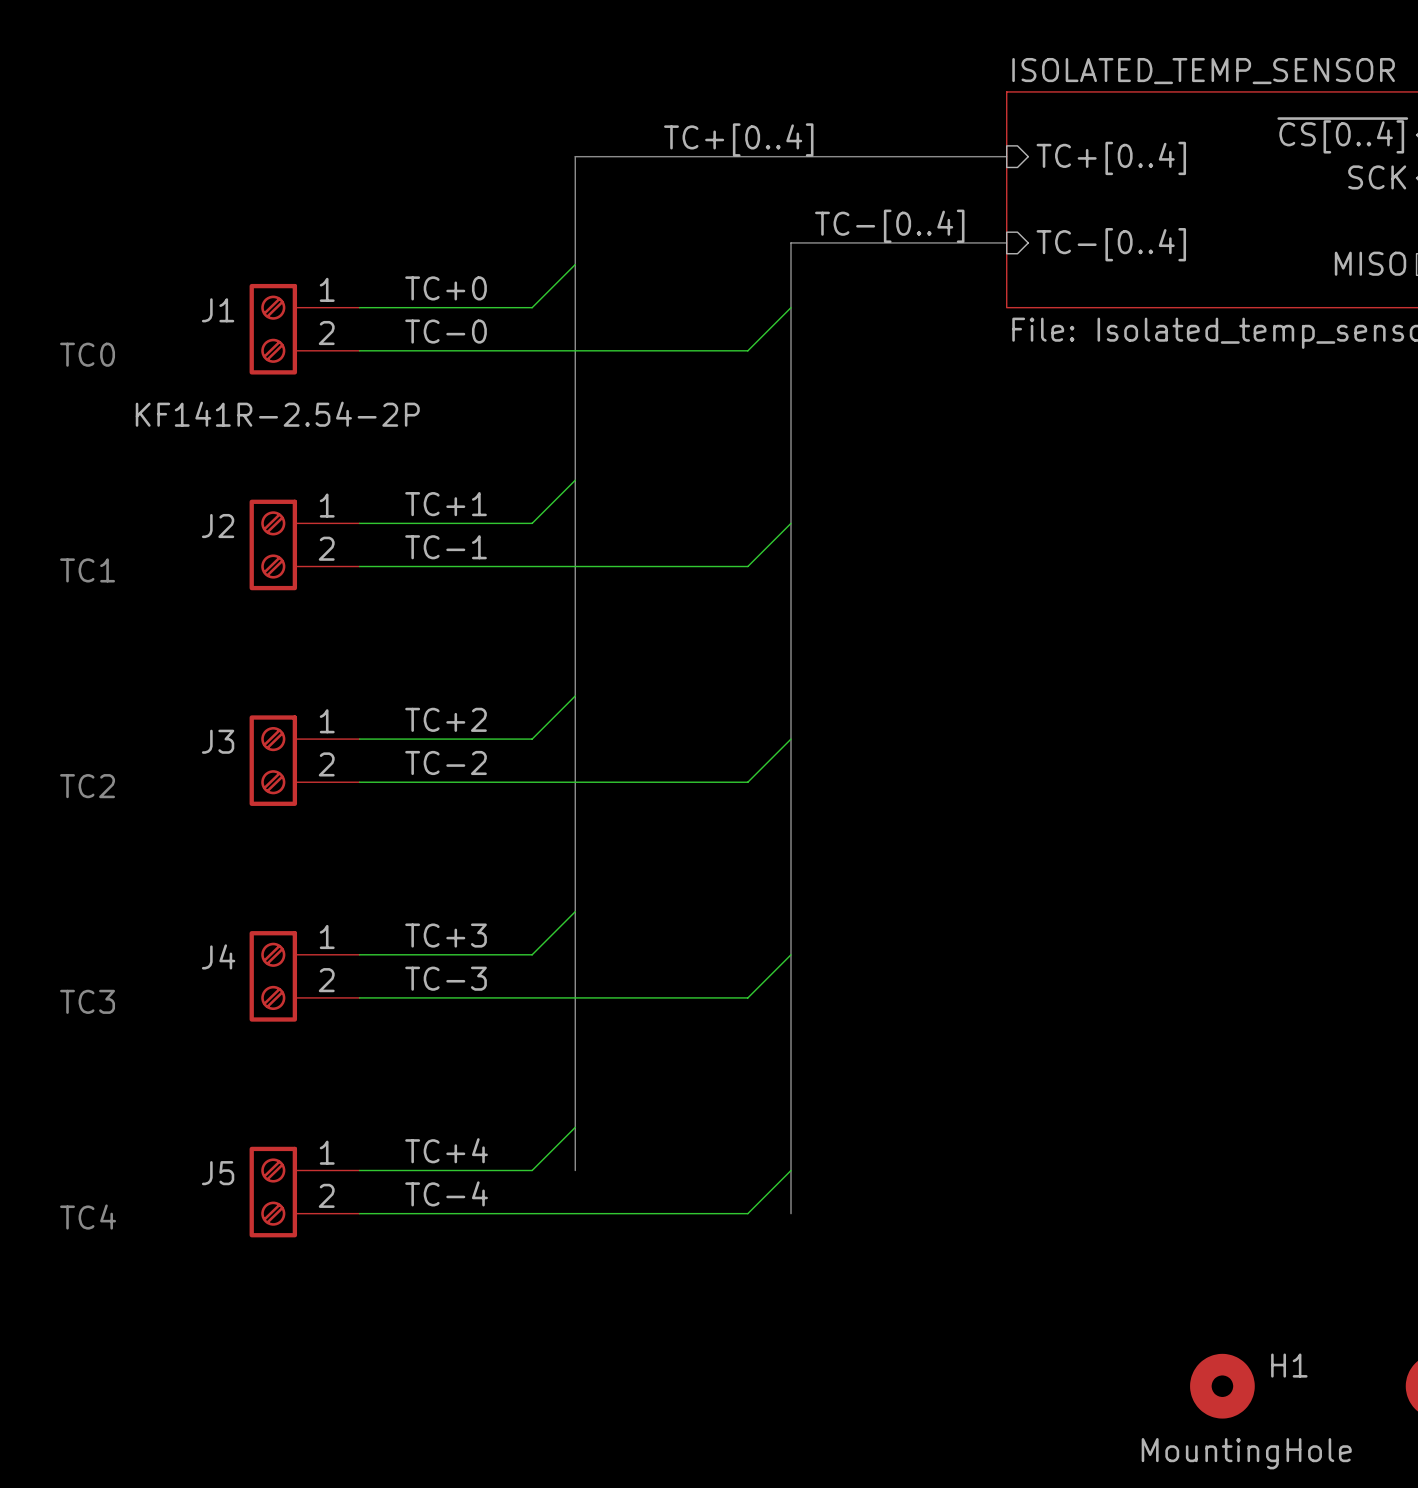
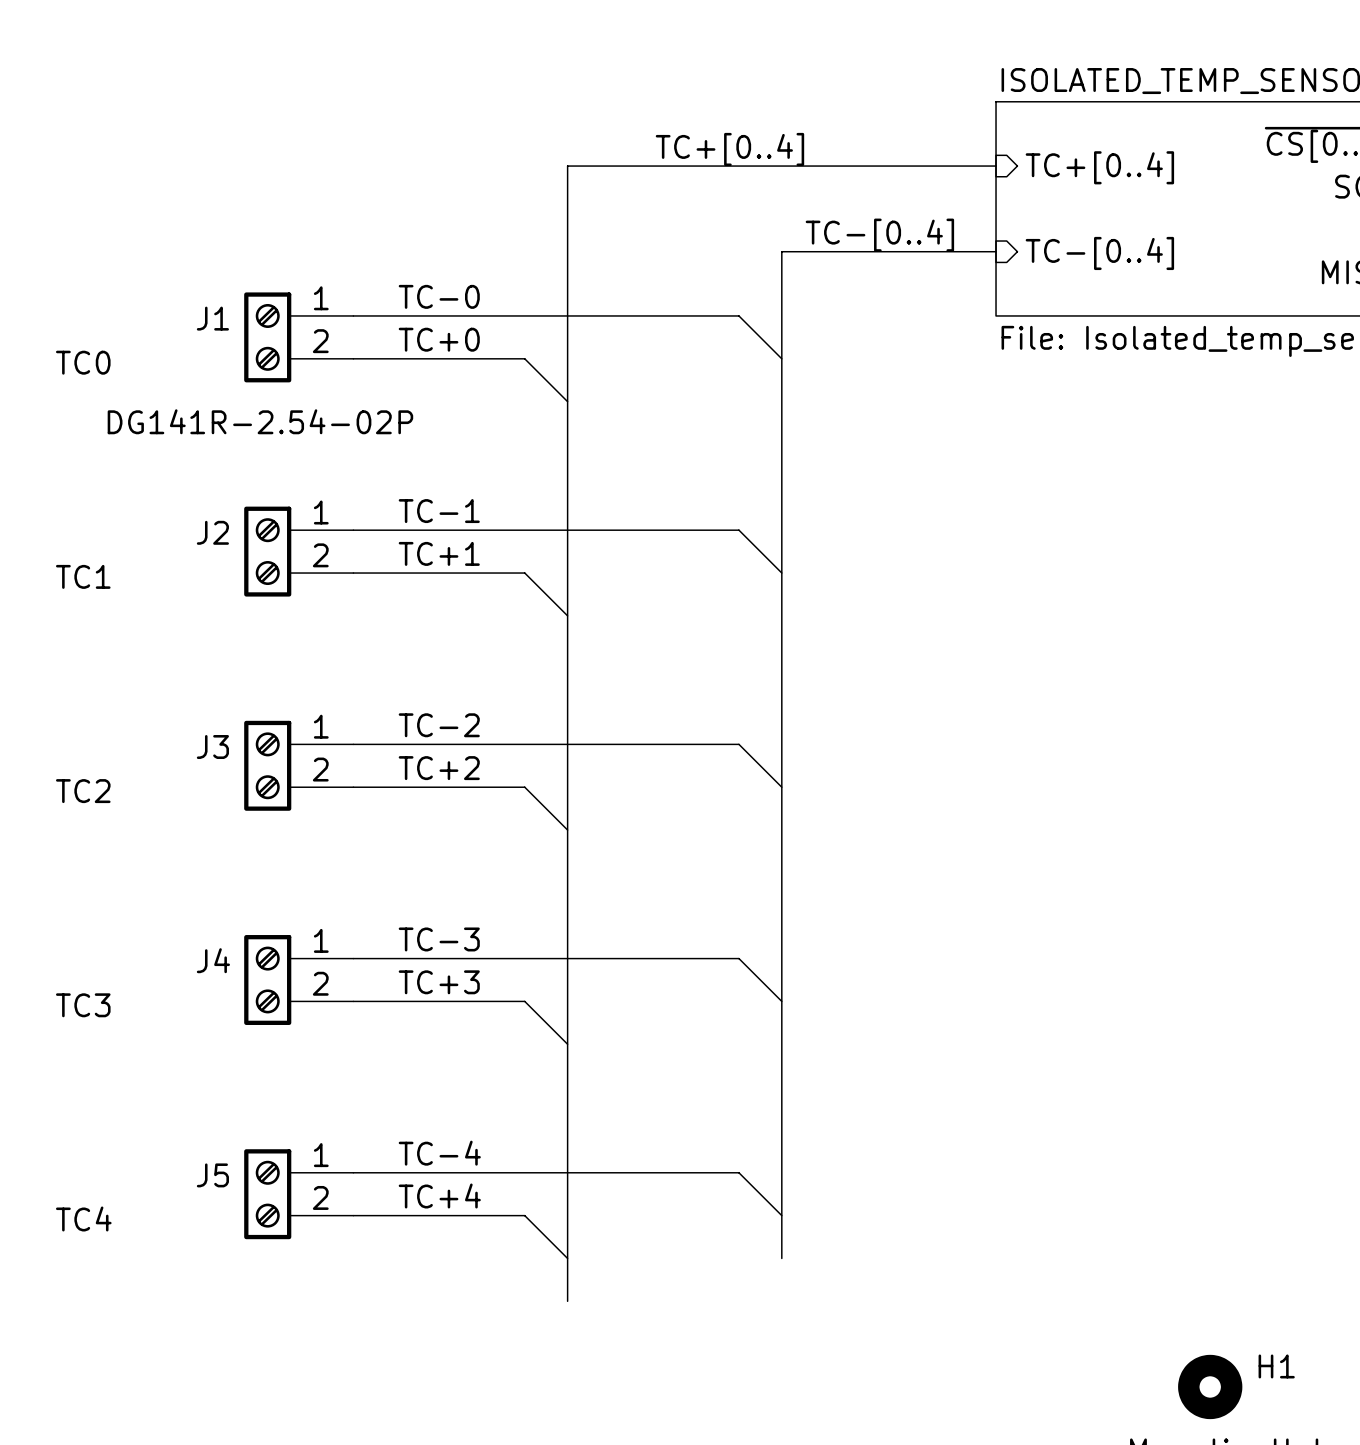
wire: (575, 264) (532, 307) -> (781, 358) (738, 315) (524, 315)
label: TC+0 (446, 288) -> TC-0 (439, 296)
wire: (791, 307) (747, 350) (532, 350) -> (567, 401) (524, 358)
label: TC-0 (446, 331) -> TC+0 (439, 339)
J1 value: KF141R-2.54-2P (277, 414) -> DG141R-2.54-02P (260, 421)
wire: (575, 480) (532, 523) -> (781, 573) (738, 530) (524, 530)
label: TC+1 (446, 504) -> TC-1 (439, 511)
wire: (791, 523) (747, 566) (532, 566) -> (567, 615) (524, 573)
label: TC-1 (446, 547) -> TC+1 (439, 553)
wire: (575, 695) (532, 739) -> (781, 787) (738, 744) (524, 744)
label: TC+2 (446, 719) -> TC-2 (439, 725)
wire: (791, 739) (747, 782) (532, 782) -> (567, 830) (524, 787)
label: TC-2 (446, 762) -> TC+2 (439, 768)
wire: (575, 911) (532, 954) -> (781, 1001) (738, 958) (524, 958)
label: TC+3 (446, 935) -> TC-3 (439, 939)
wire: (791, 954) (747, 997) (532, 997) -> (567, 1044) (524, 1001)
label: TC-3 (446, 978) -> TC+3 (439, 982)
wire: (575, 1127) (532, 1170) -> (781, 1215) (738, 1172) (524, 1172)
label: TC+4 (446, 1150) -> TC-4 (439, 1153)
bus: none -> (567, 1172) (567, 1301)
wire: (791, 1170) (747, 1213) (532, 1213) -> (567, 1258) (524, 1215)
label: TC-4 (446, 1193) -> TC+4 (439, 1196)
bus: none -> (781, 1215) (781, 1258)

